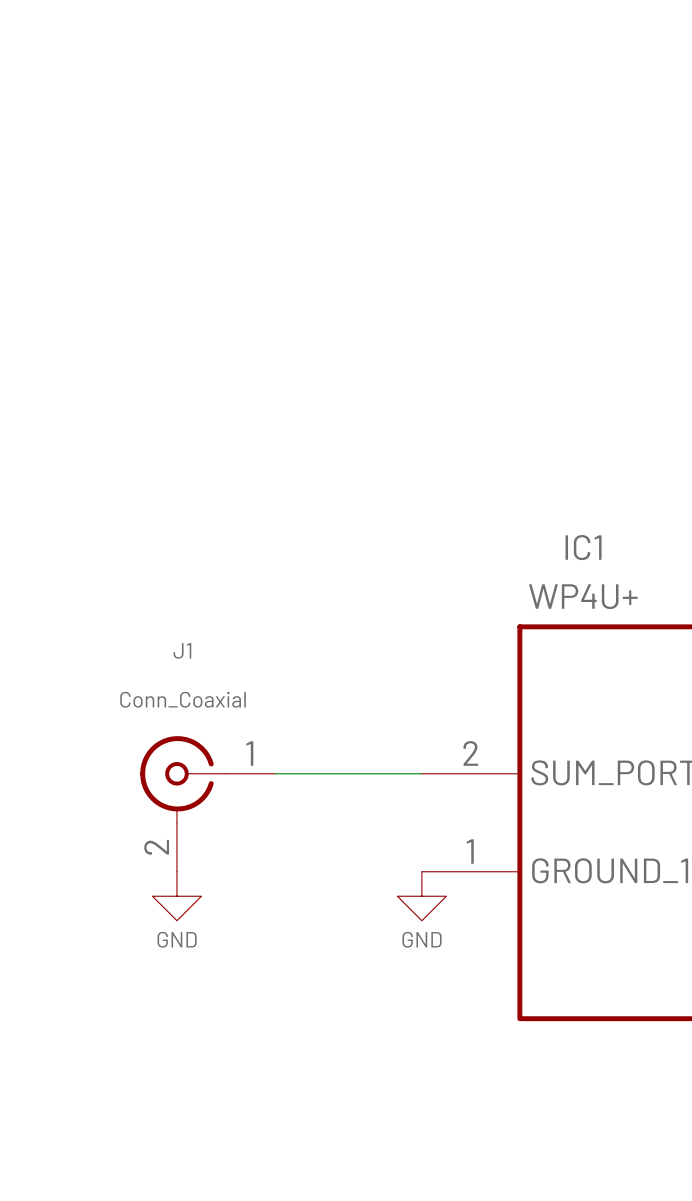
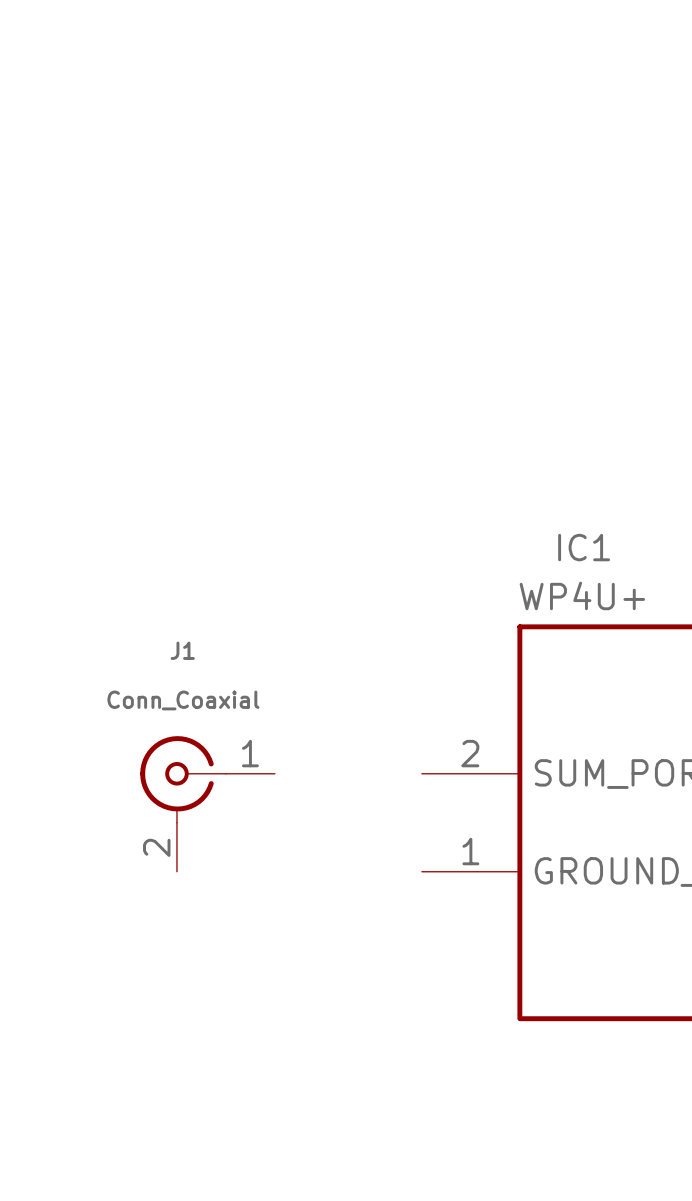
wire: (274, 773) (421, 773) -> none
power symbol: GND (176, 896) -> none
power symbol: GND (421, 896) -> none

